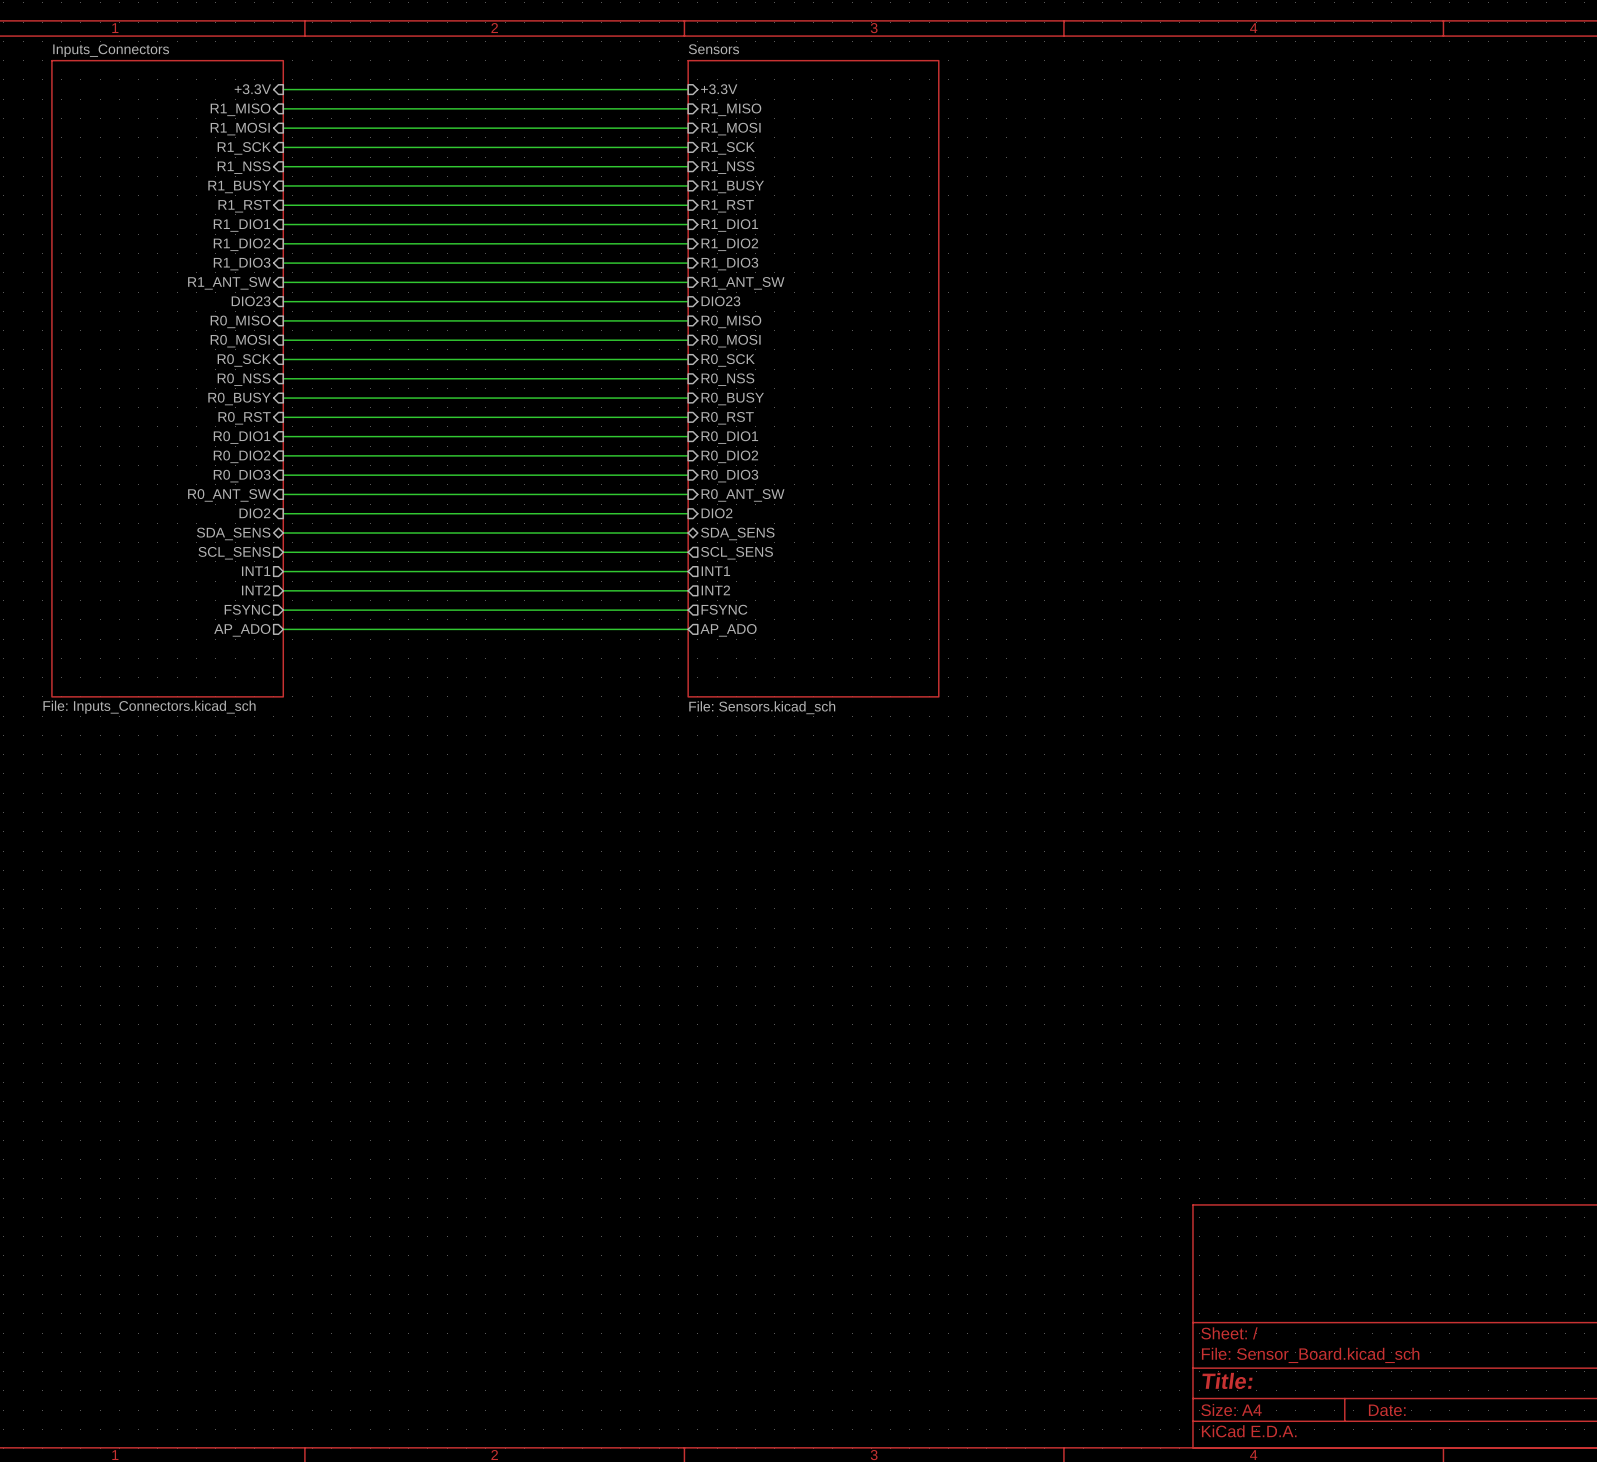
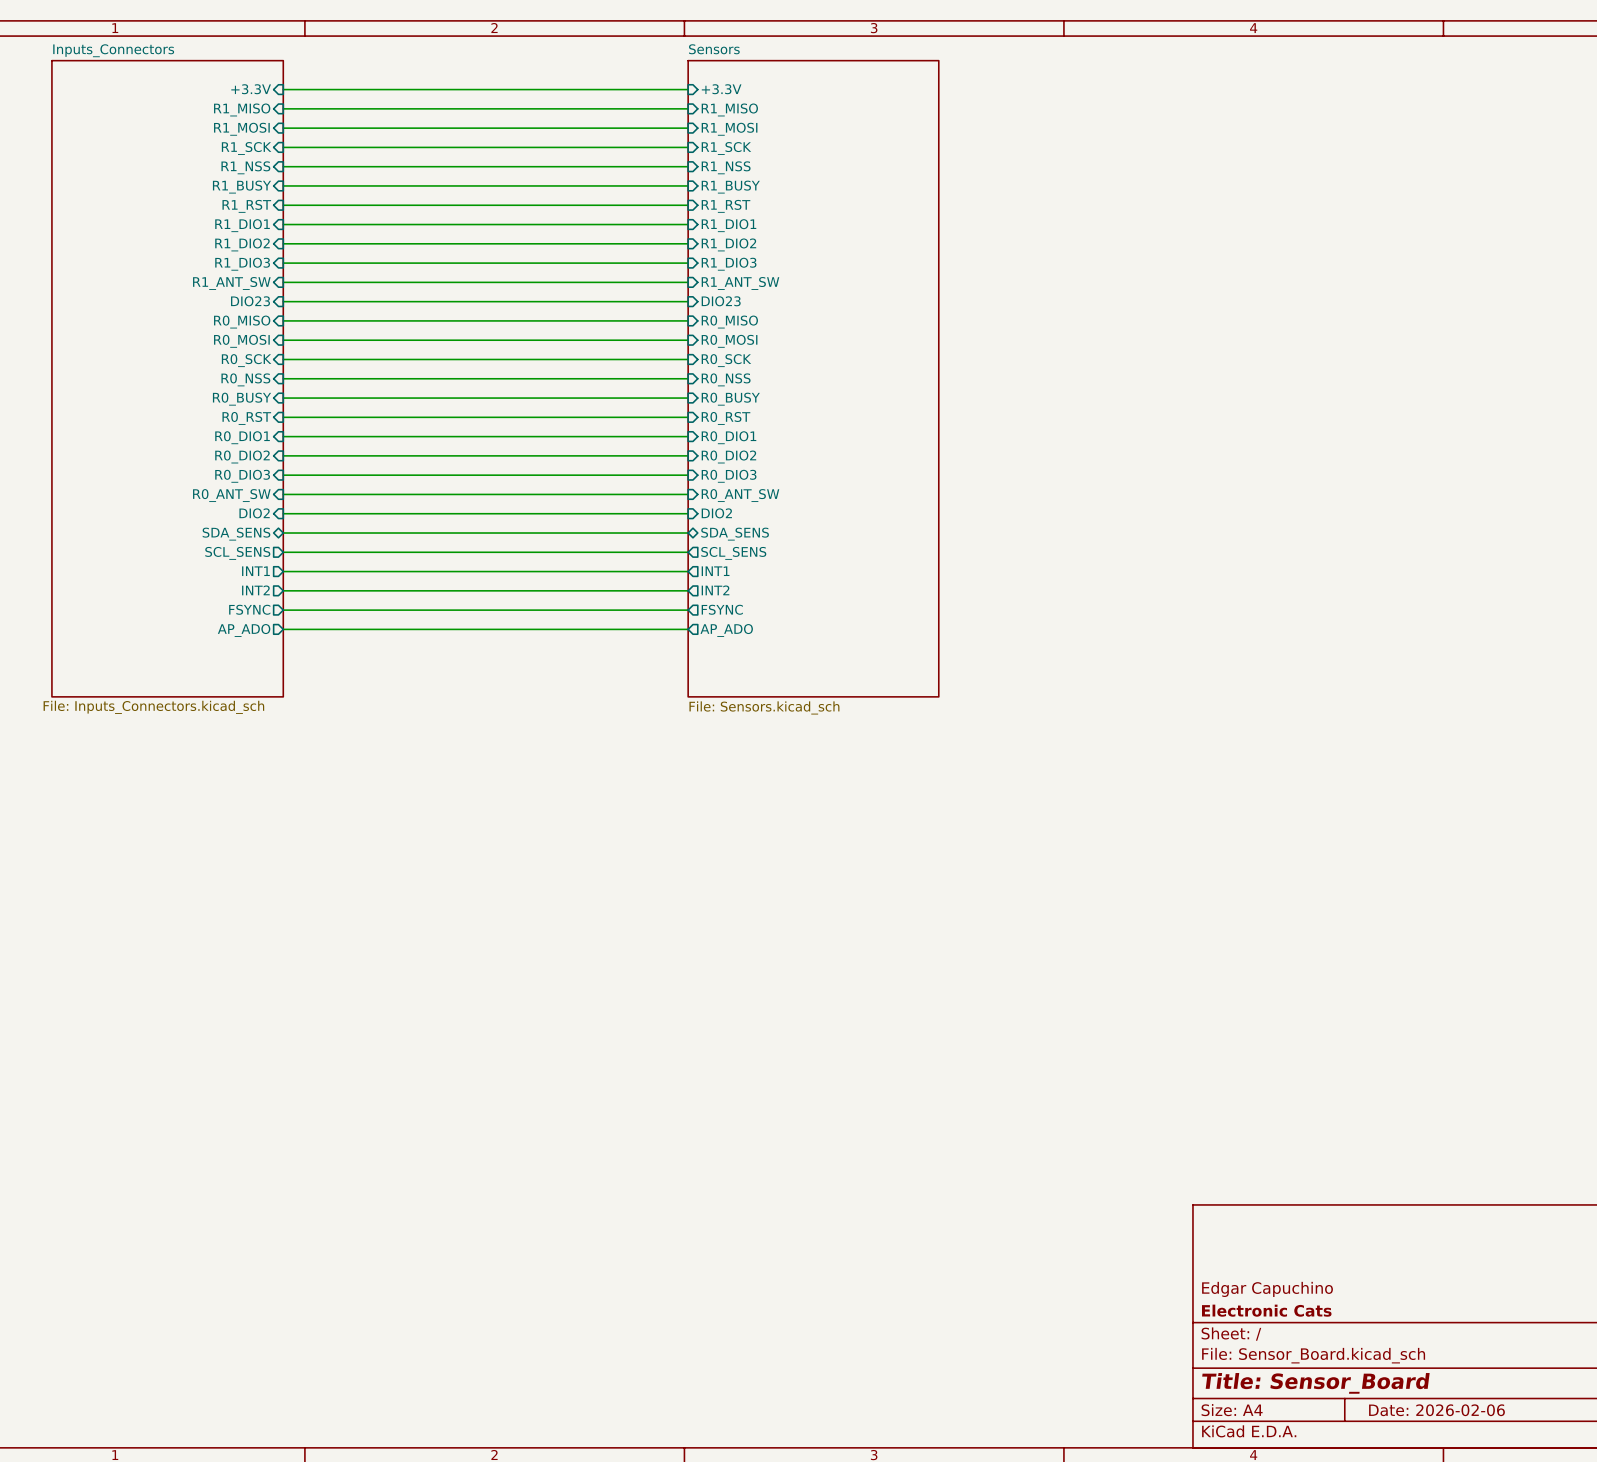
title block: none -> Edgar Capuchino (1267, 1289)
title block: none -> Electronic Cats (1266, 1310)
title block: Title: (1227, 1380) -> Title: Sensor_Board (1315, 1383)
title block: Date: (1387, 1410) -> Date: 2026-02-06 (1436, 1410)

